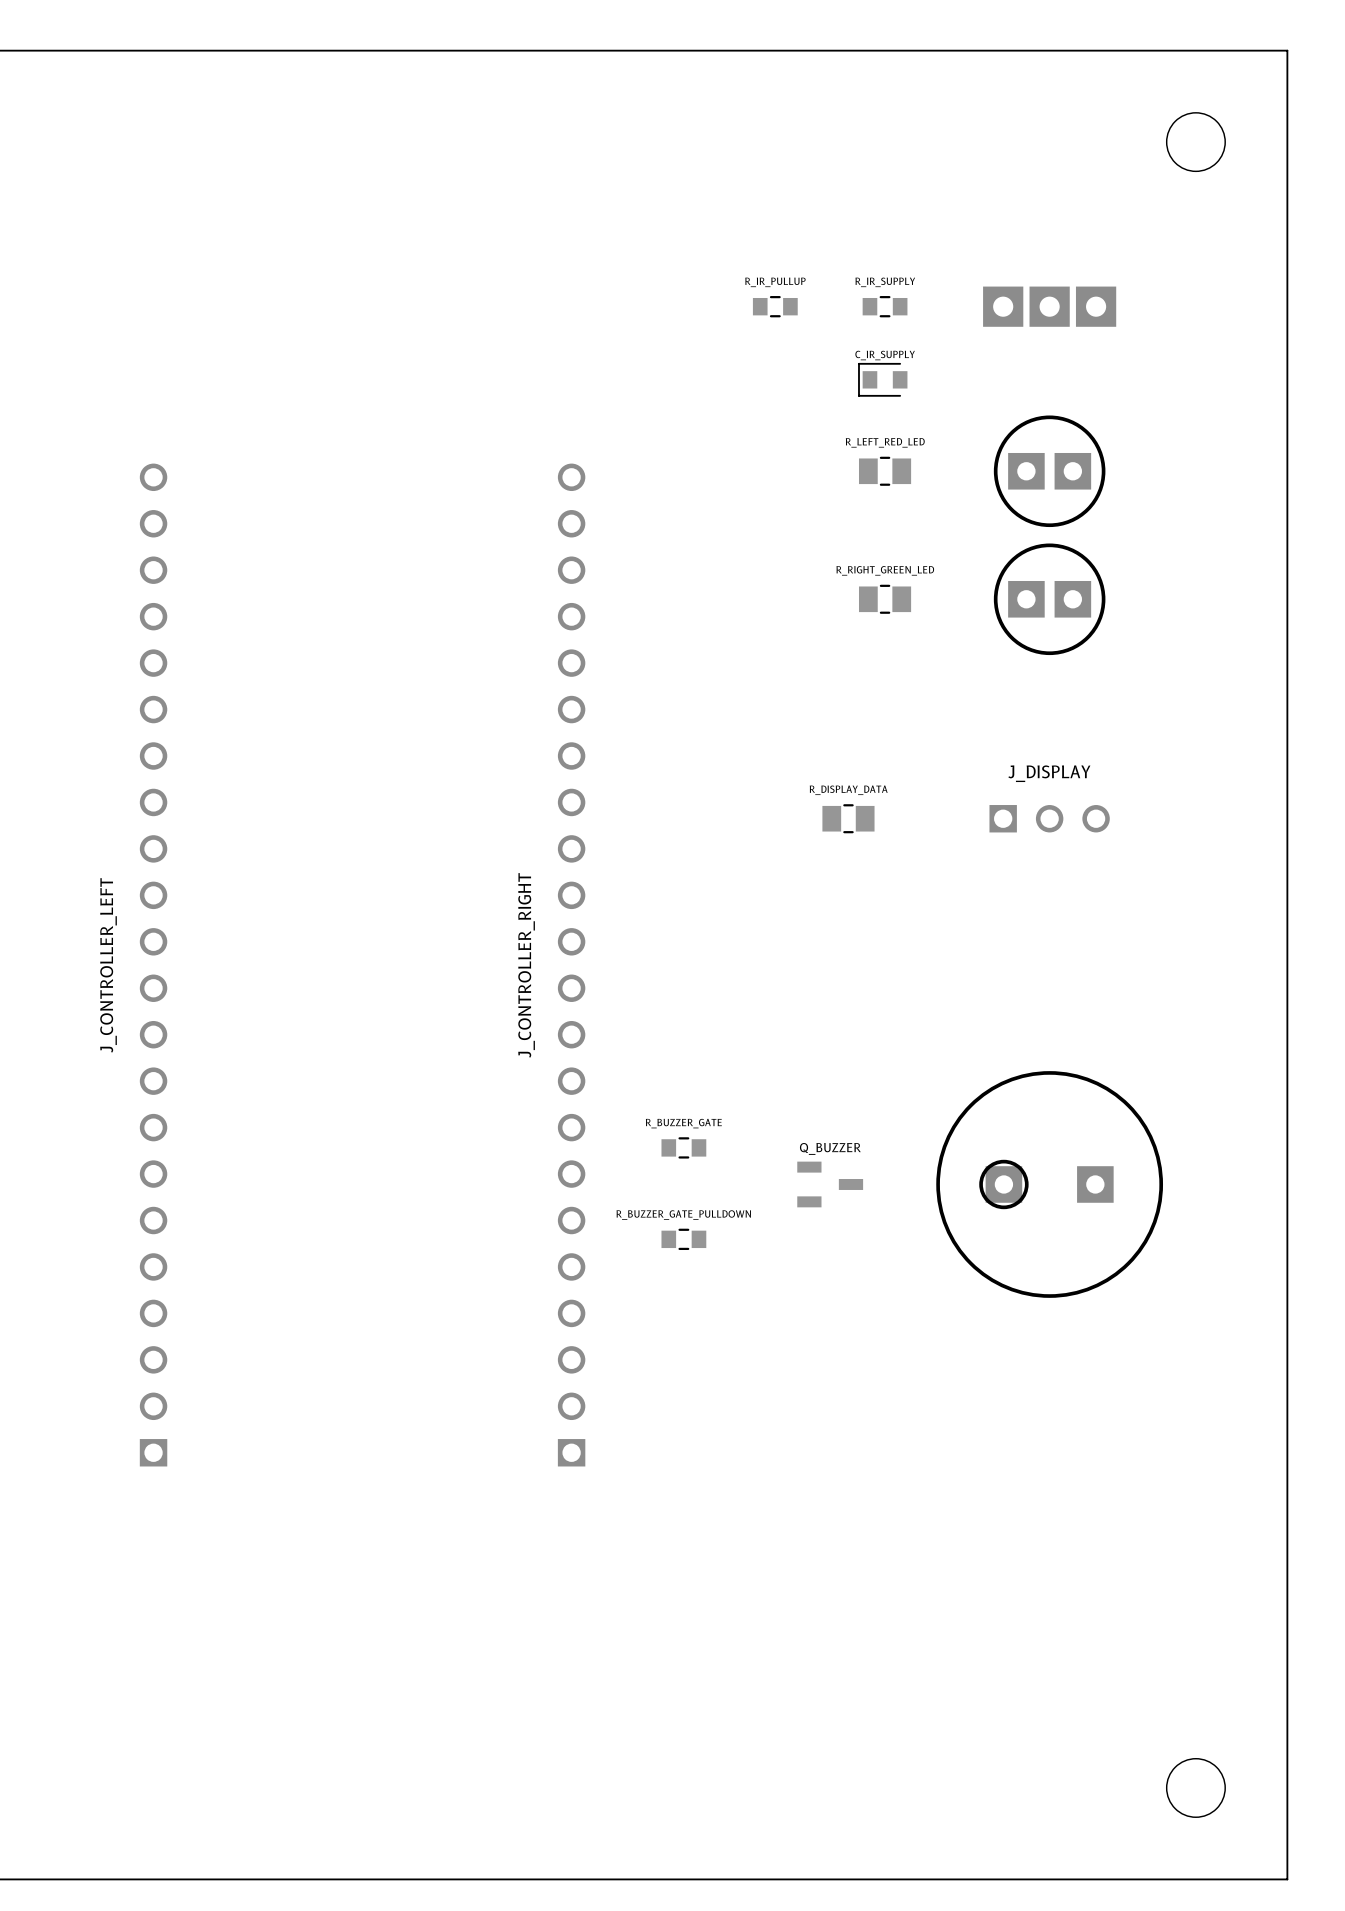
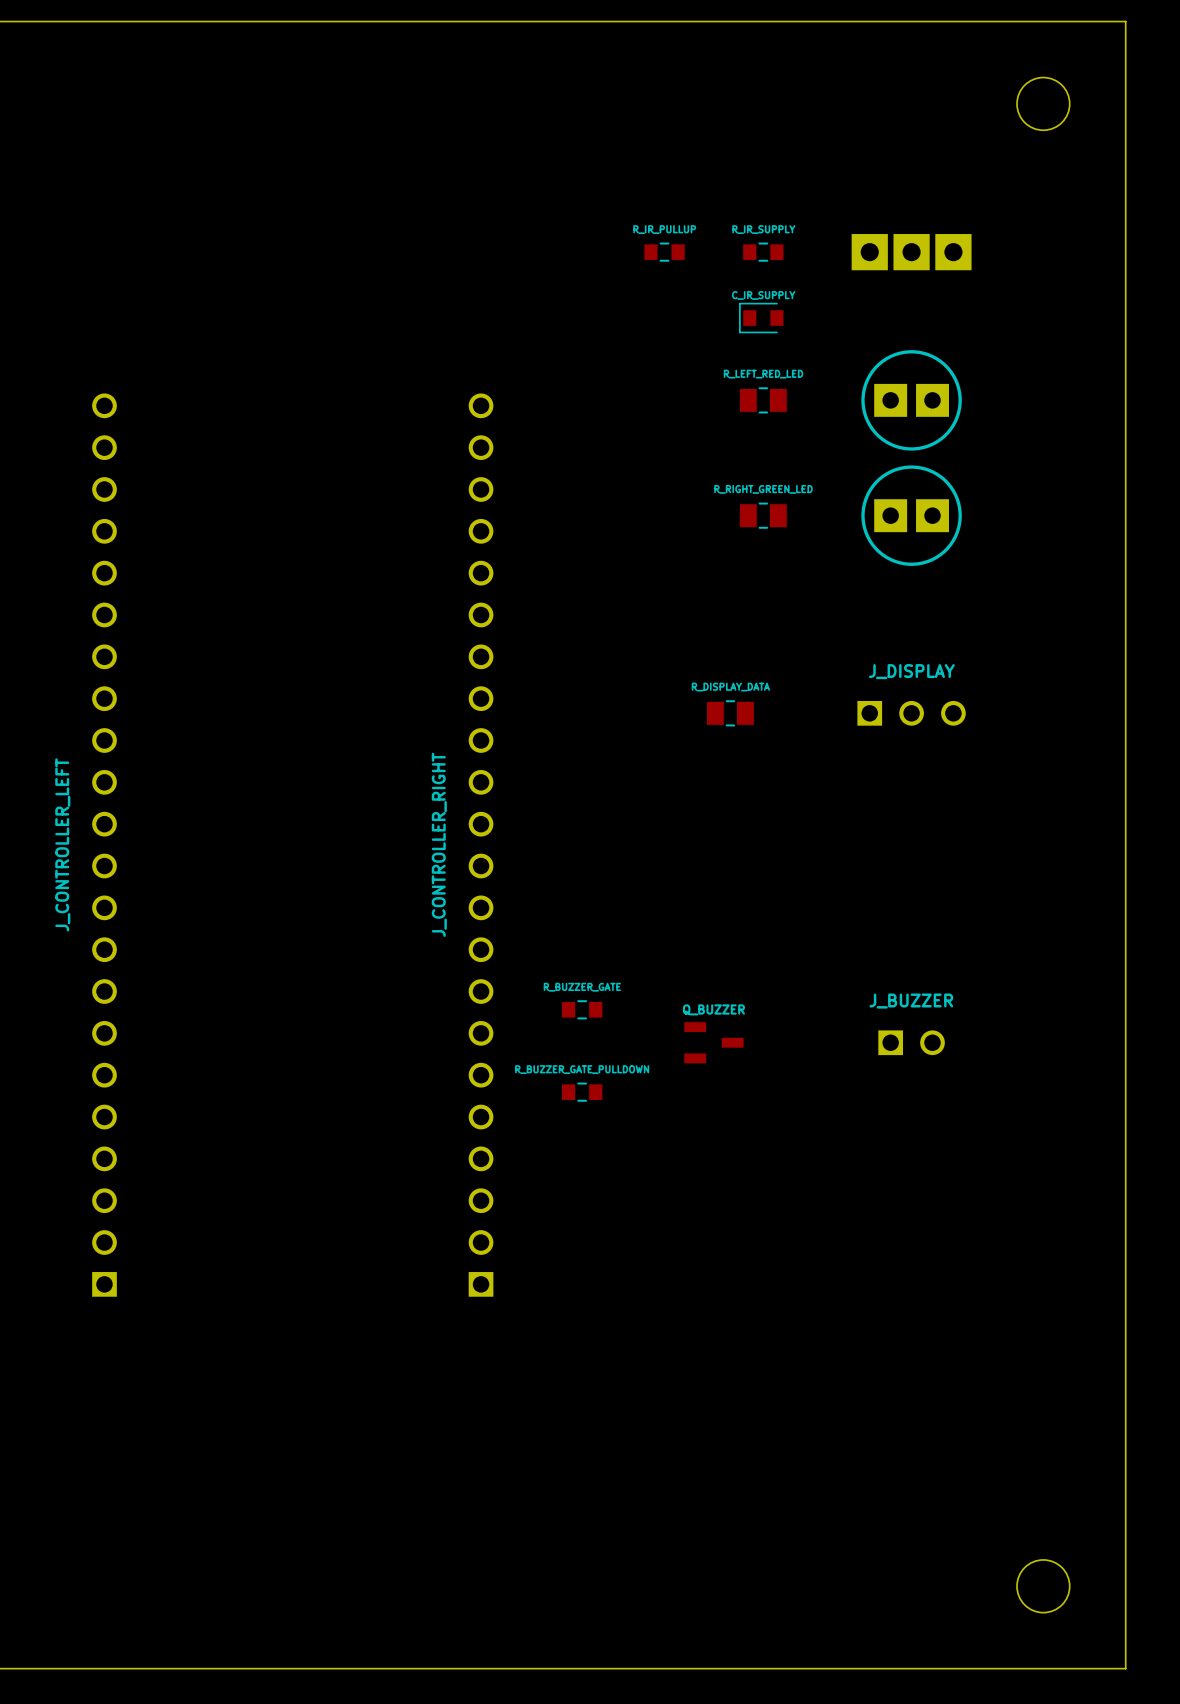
part: (1049, 1184) -> none
J_BUZZER: none -> (911, 1042)

